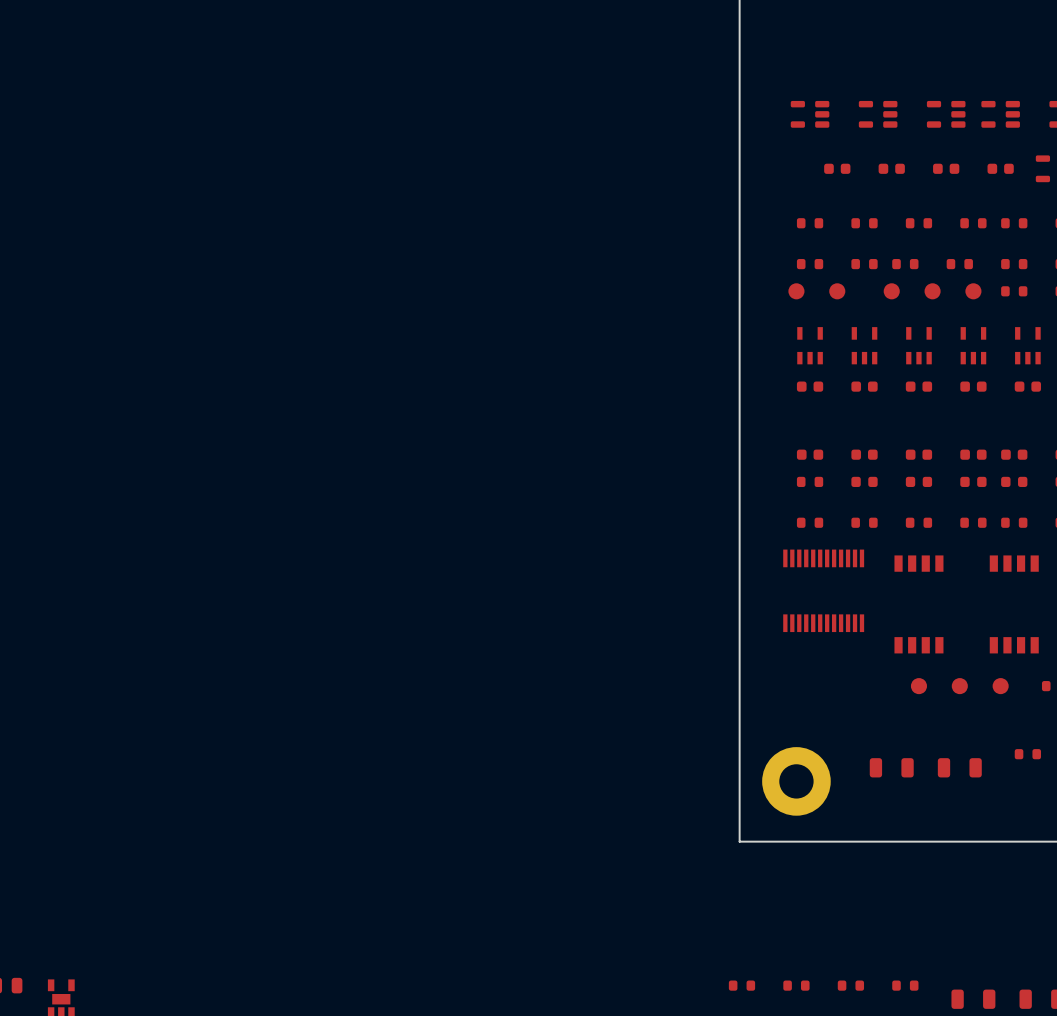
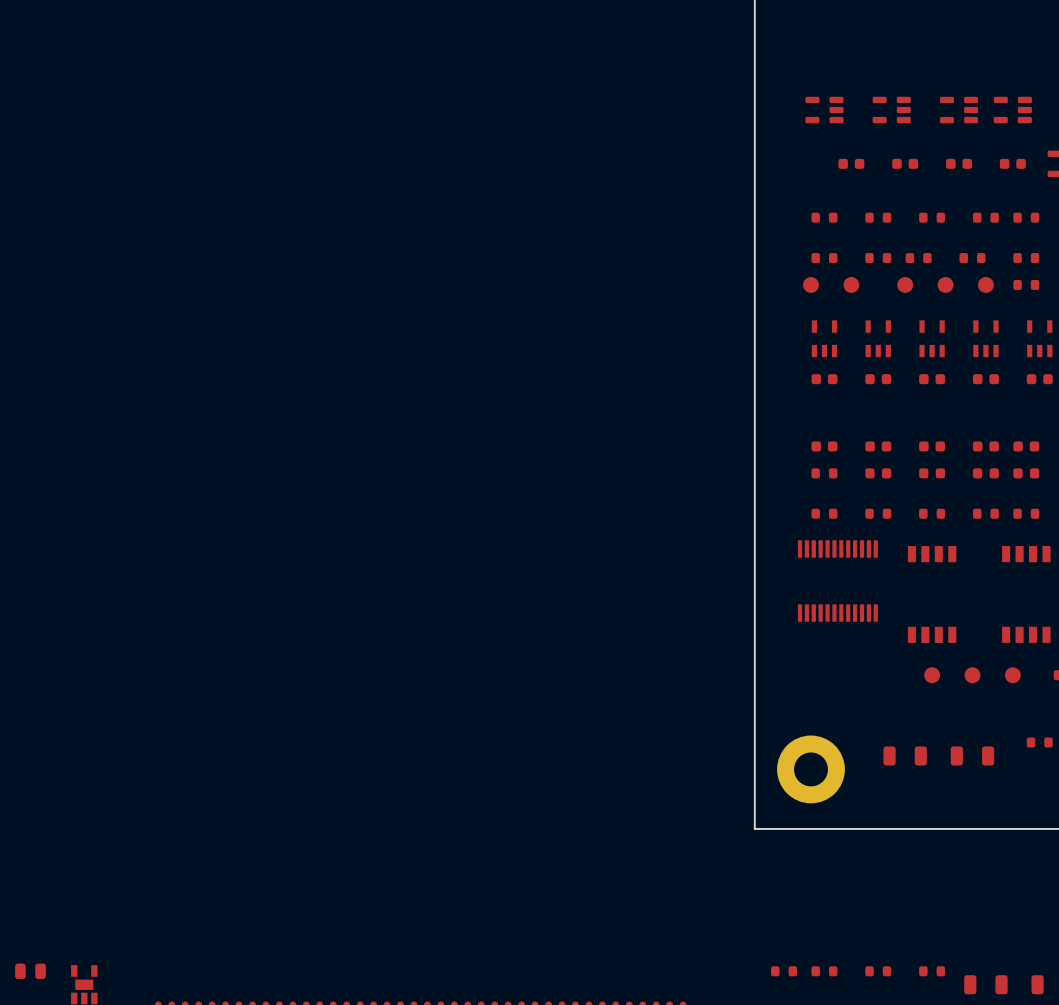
part: (741, 985) -> none
part: none -> (784, 971)
part: (796, 985) -> none
part: none -> (824, 971)
part position: (850, 985) -> (878, 971)
part position: (905, 985) -> (932, 971)

